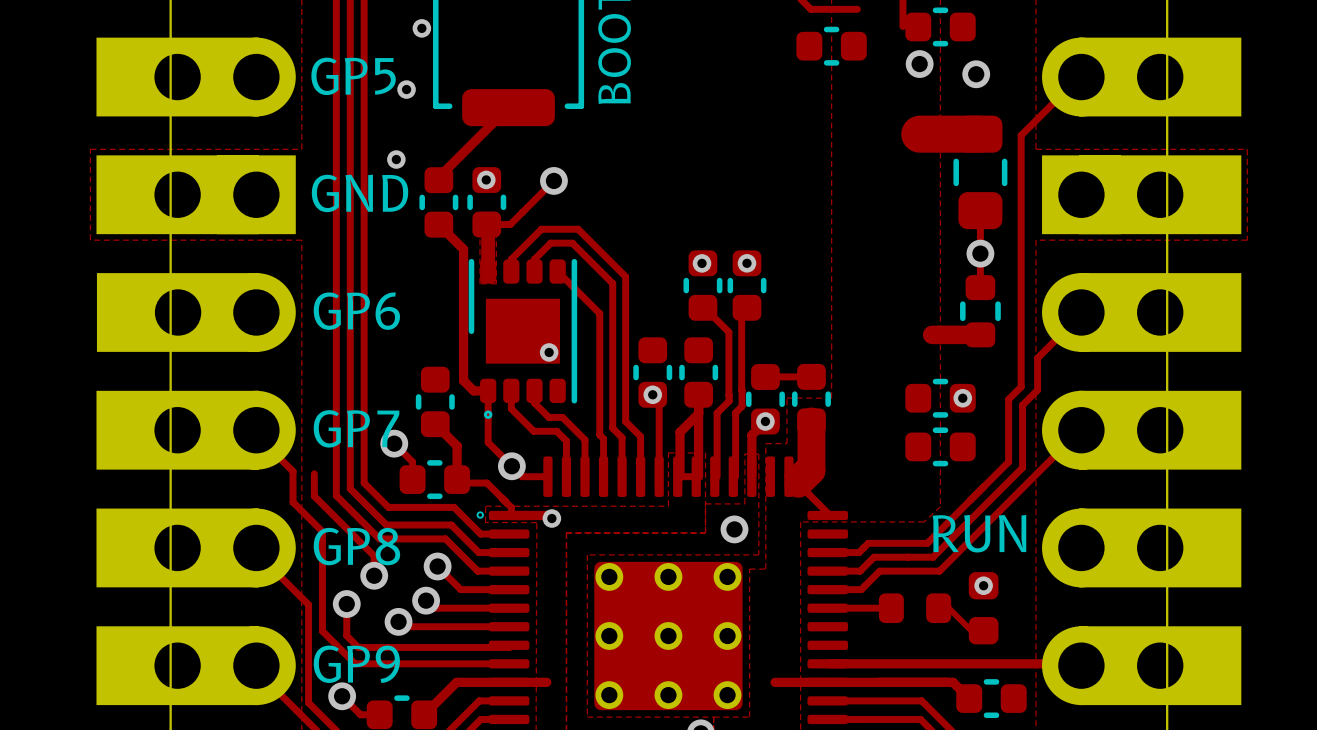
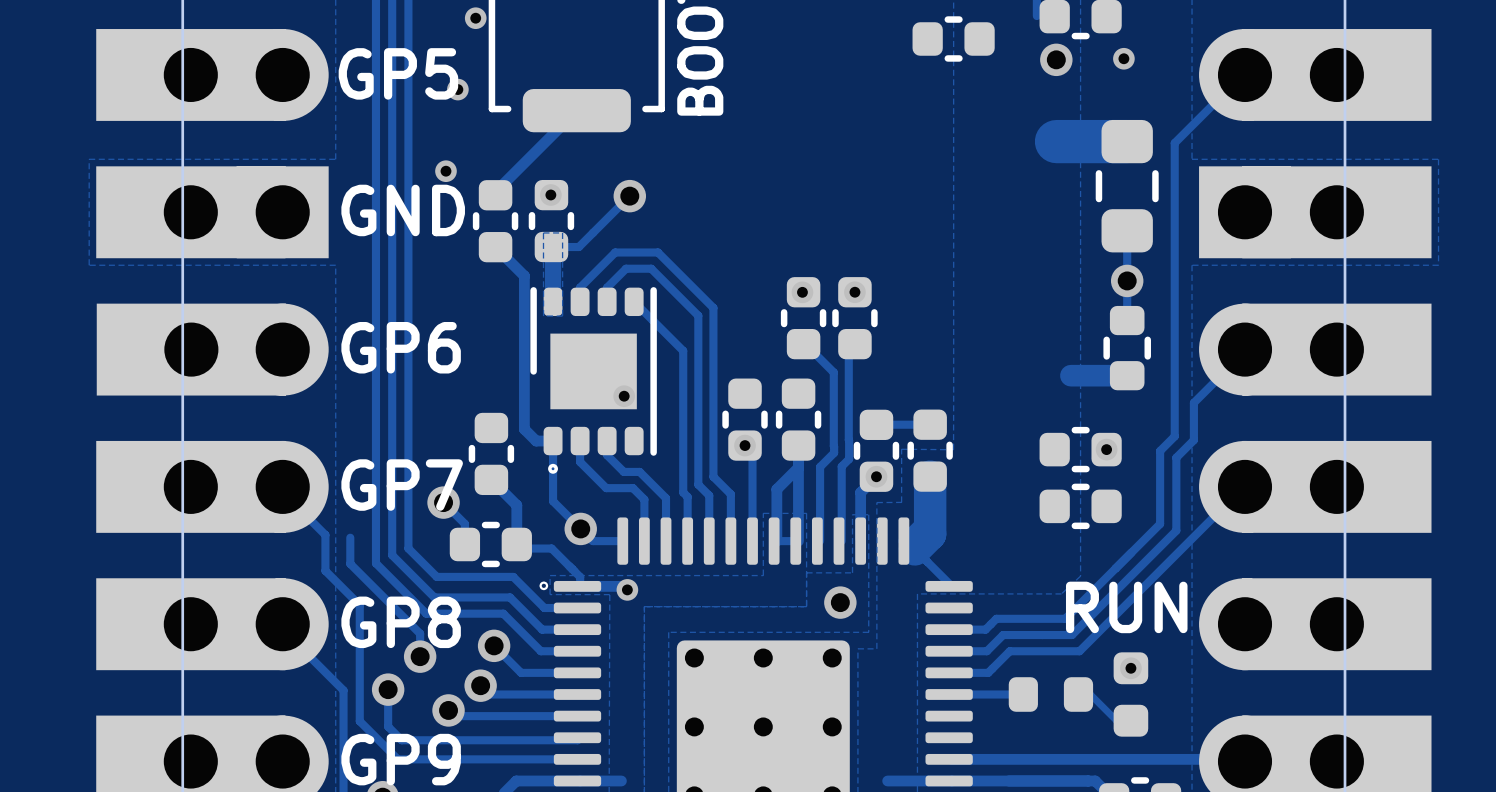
via size: [962, 60, 991, 89] -> [1113, 47, 1135, 70]

